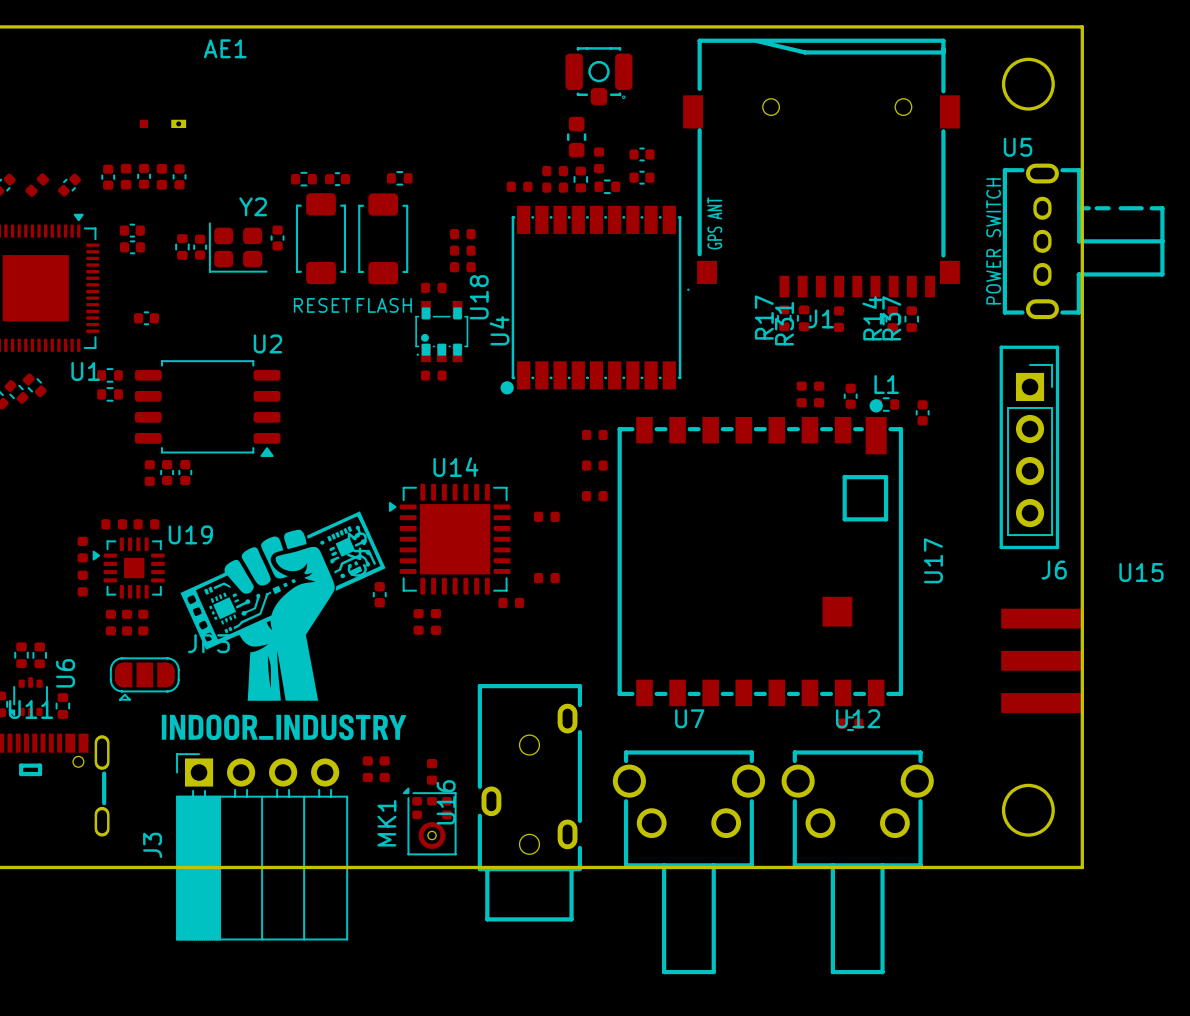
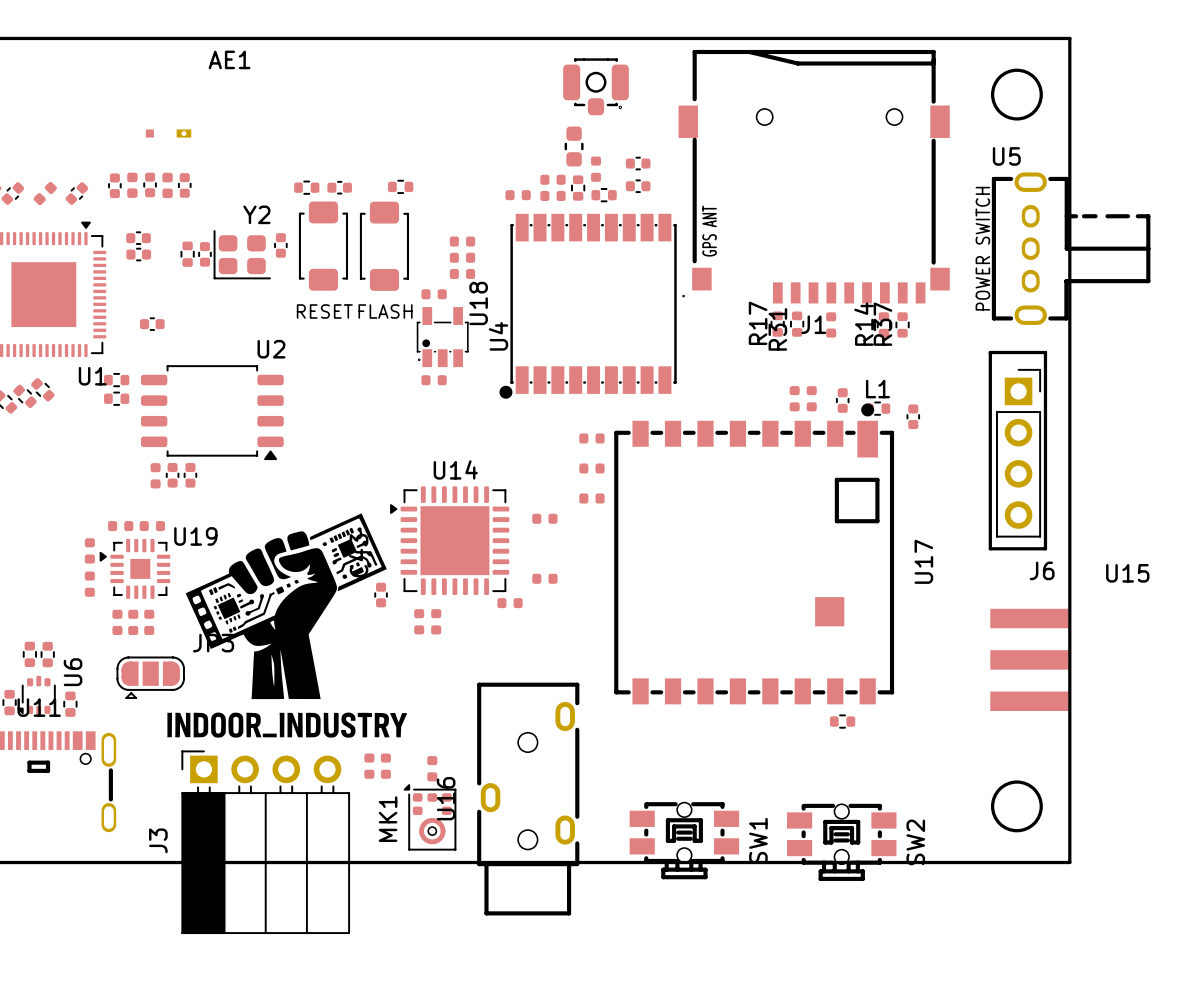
U4 footprint: [415, 300, 469, 363] -> [416, 307, 469, 368]
SW1: none -> (684, 840)
SW2: none -> (841, 842)
U7: (688, 862) -> none
U12: (857, 862) -> none

